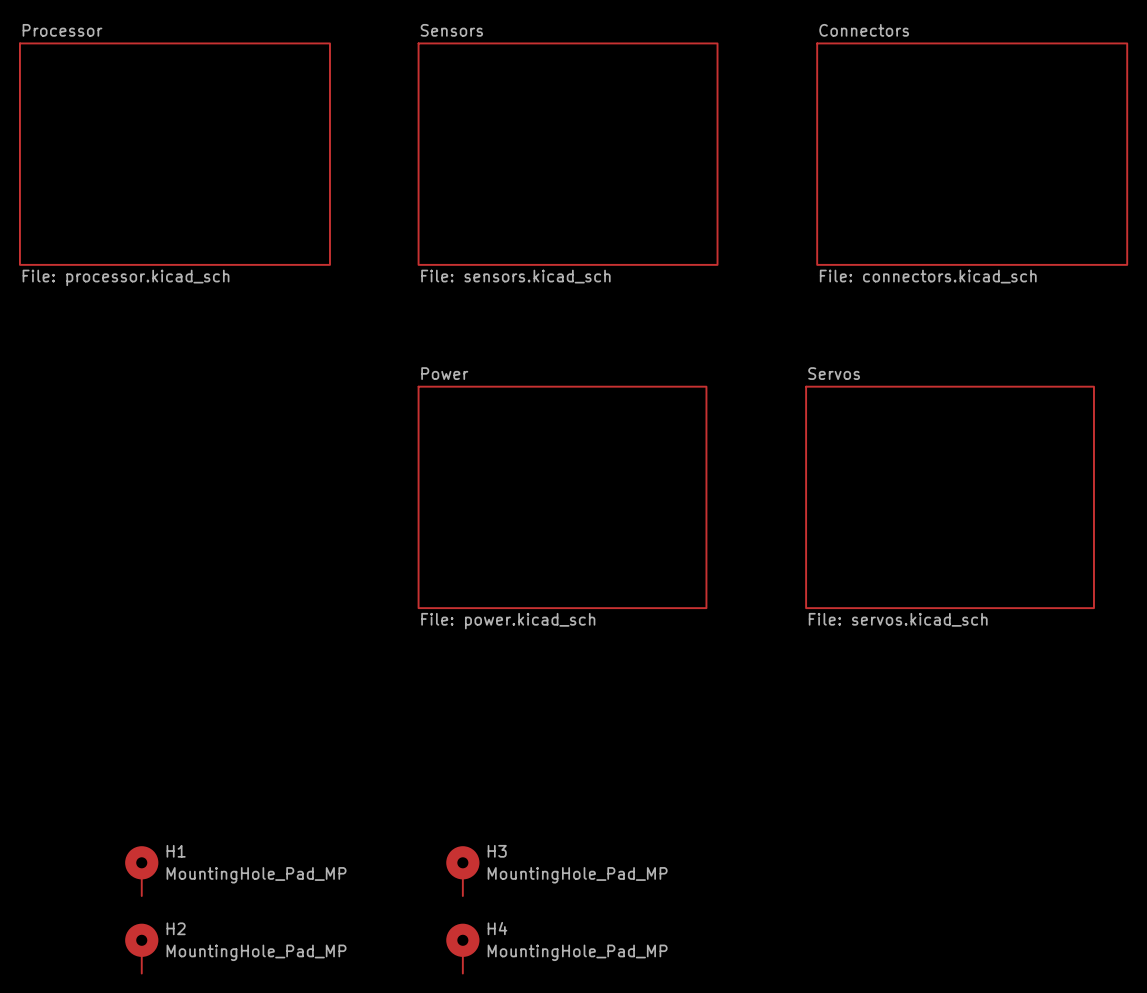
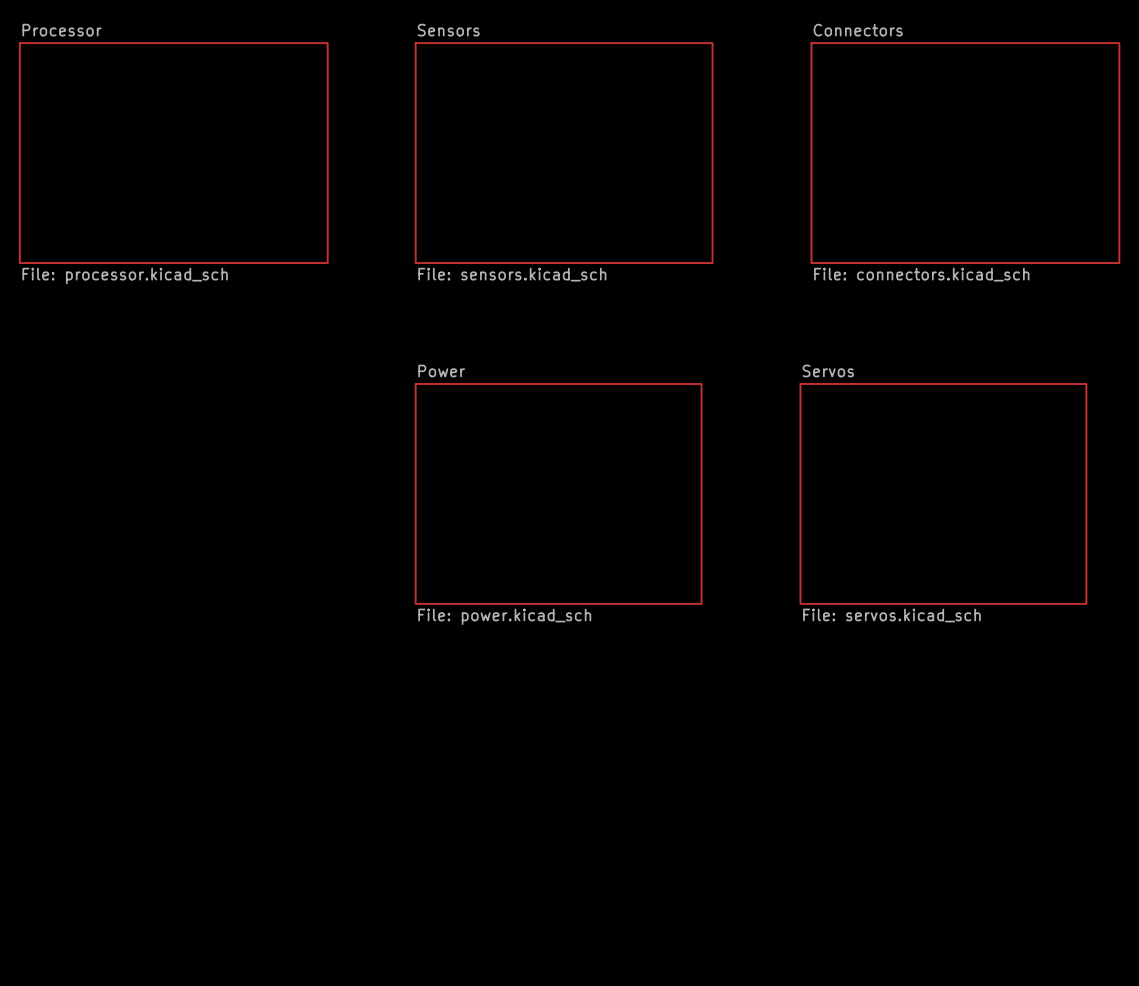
H1: MountingHole_Pad_MP (141, 871) -> none
H3: MountingHole_Pad_MP (462, 871) -> none
H2: MountingHole_Pad_MP (141, 948) -> none
H4: MountingHole_Pad_MP (462, 948) -> none

